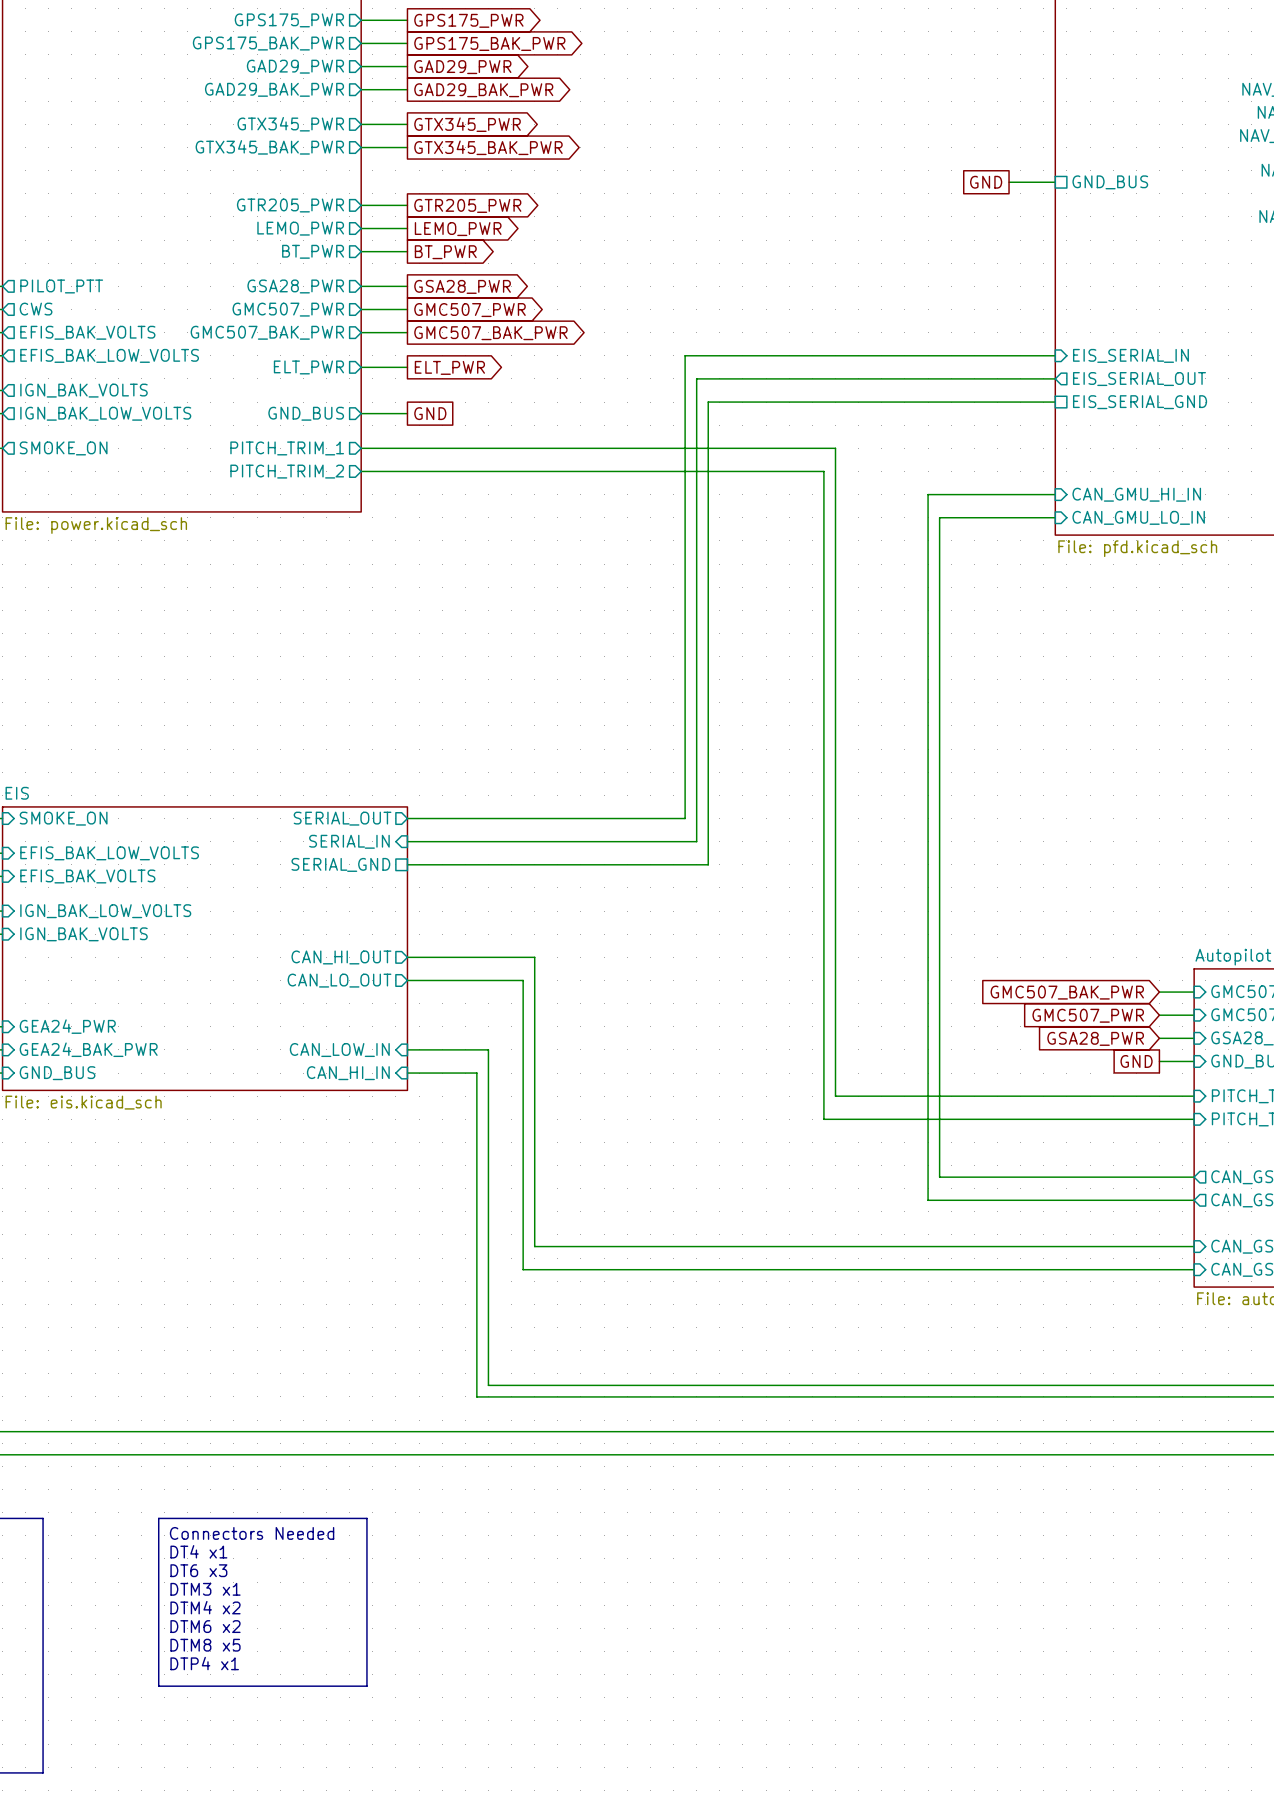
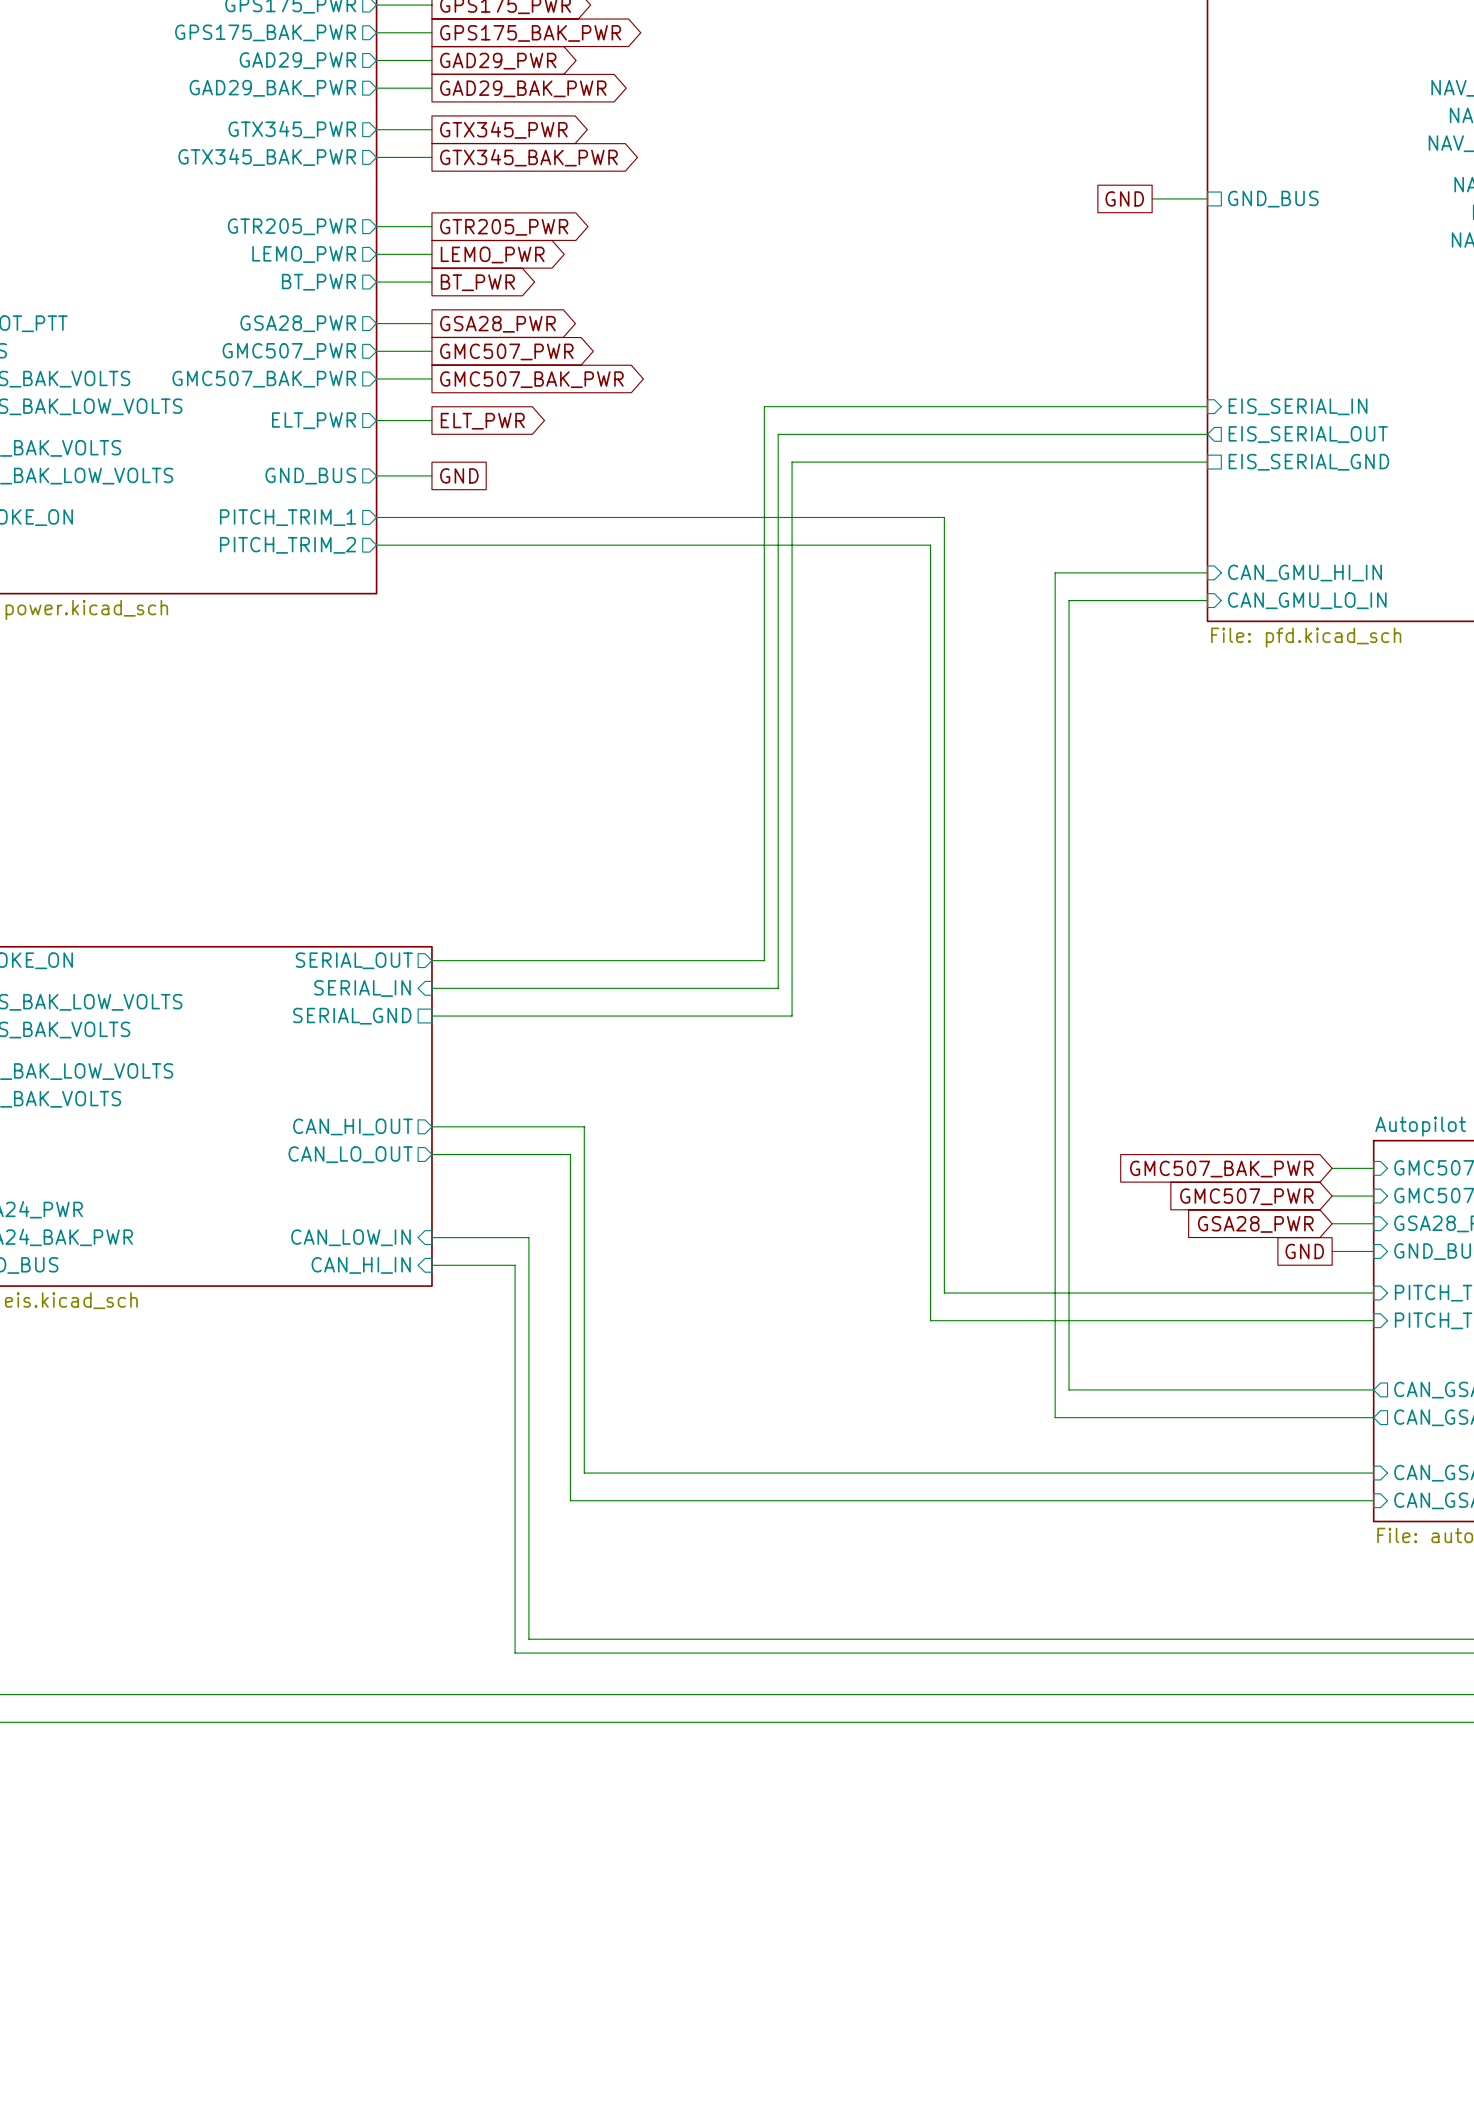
line: (158, 1518) (366, 1518) (366, 1686) (158, 1686) (158, 1518) -> none
text: Connectors Needed (252, 1533) -> none
text: DT4 x1 (198, 1551) -> none
text: DT6 x3 (198, 1570) -> none
text: DTM3 x1 (205, 1589) -> none
text: DTM4 x2 (205, 1607) -> none
text: DTM6 x2 (205, 1626) -> none
text: DTM8 x5 (205, 1645) -> none
text: DTP4 x1 (204, 1663) -> none

